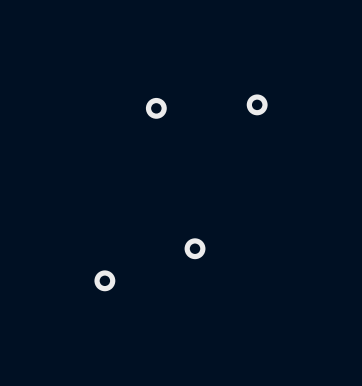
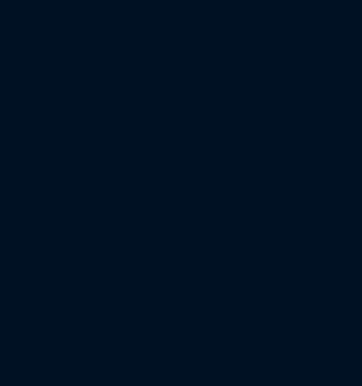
via: (257, 104) -> none
via: (156, 108) -> none
via: (195, 248) -> none
via: (104, 280) -> none

